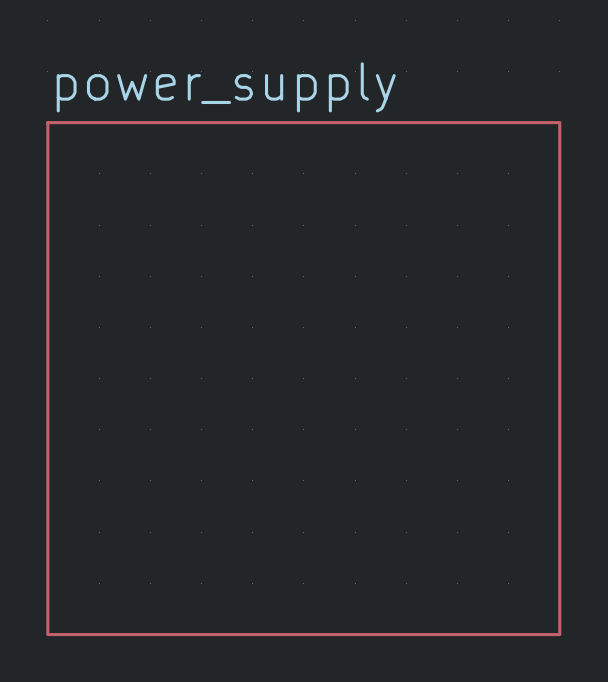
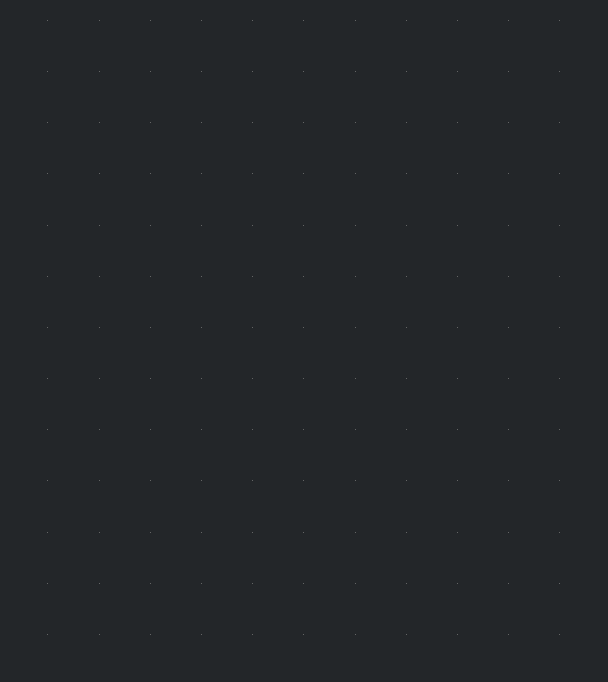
sheet power_supply: (303, 378) -> none

